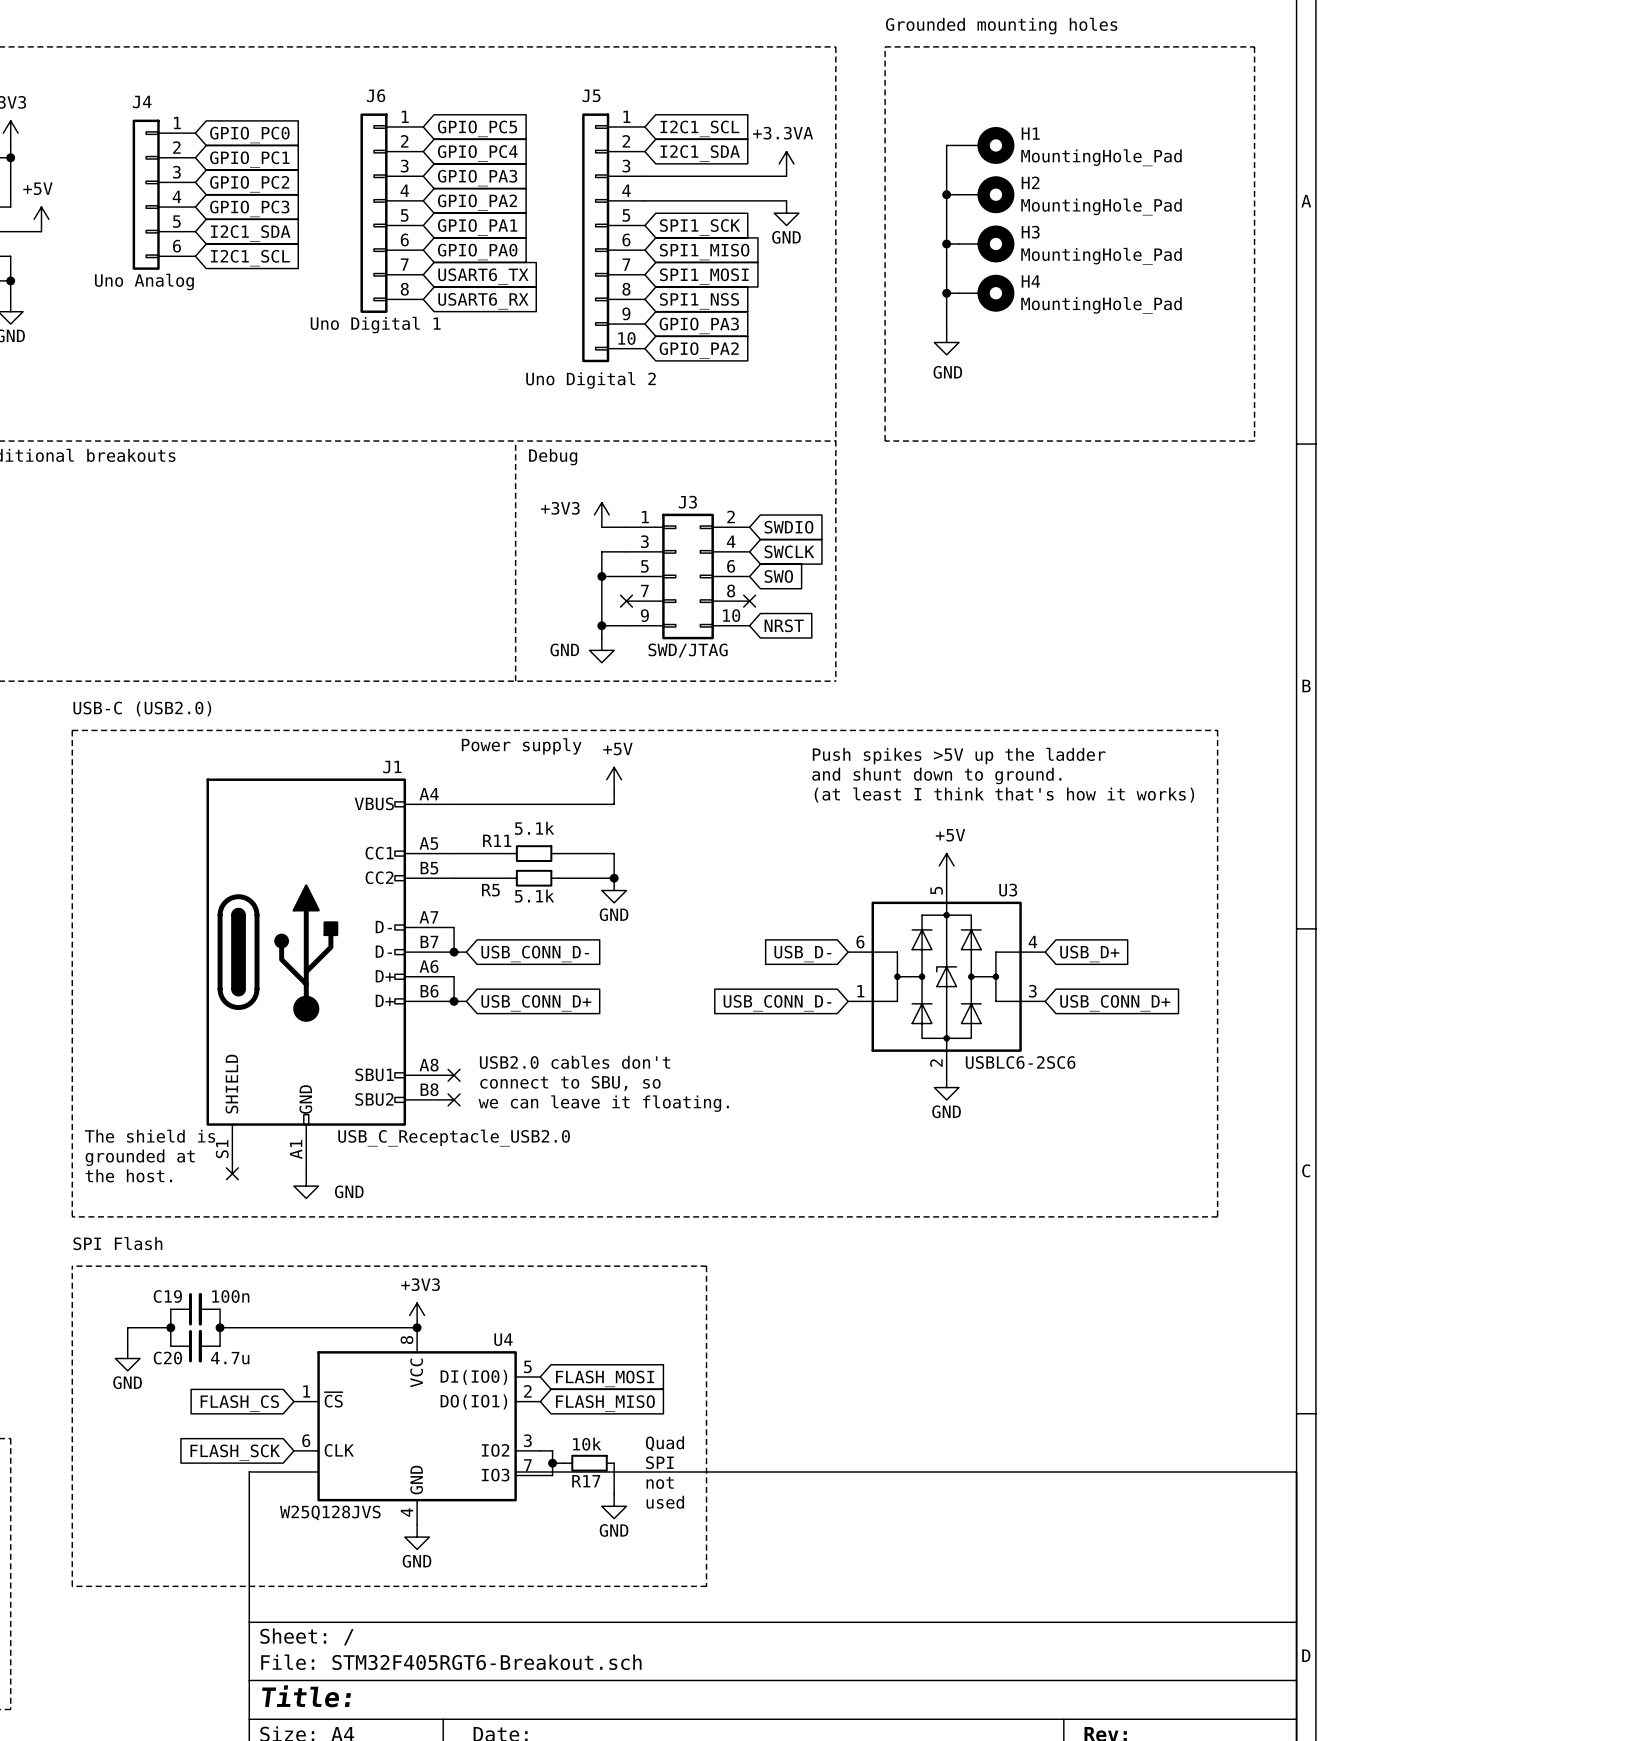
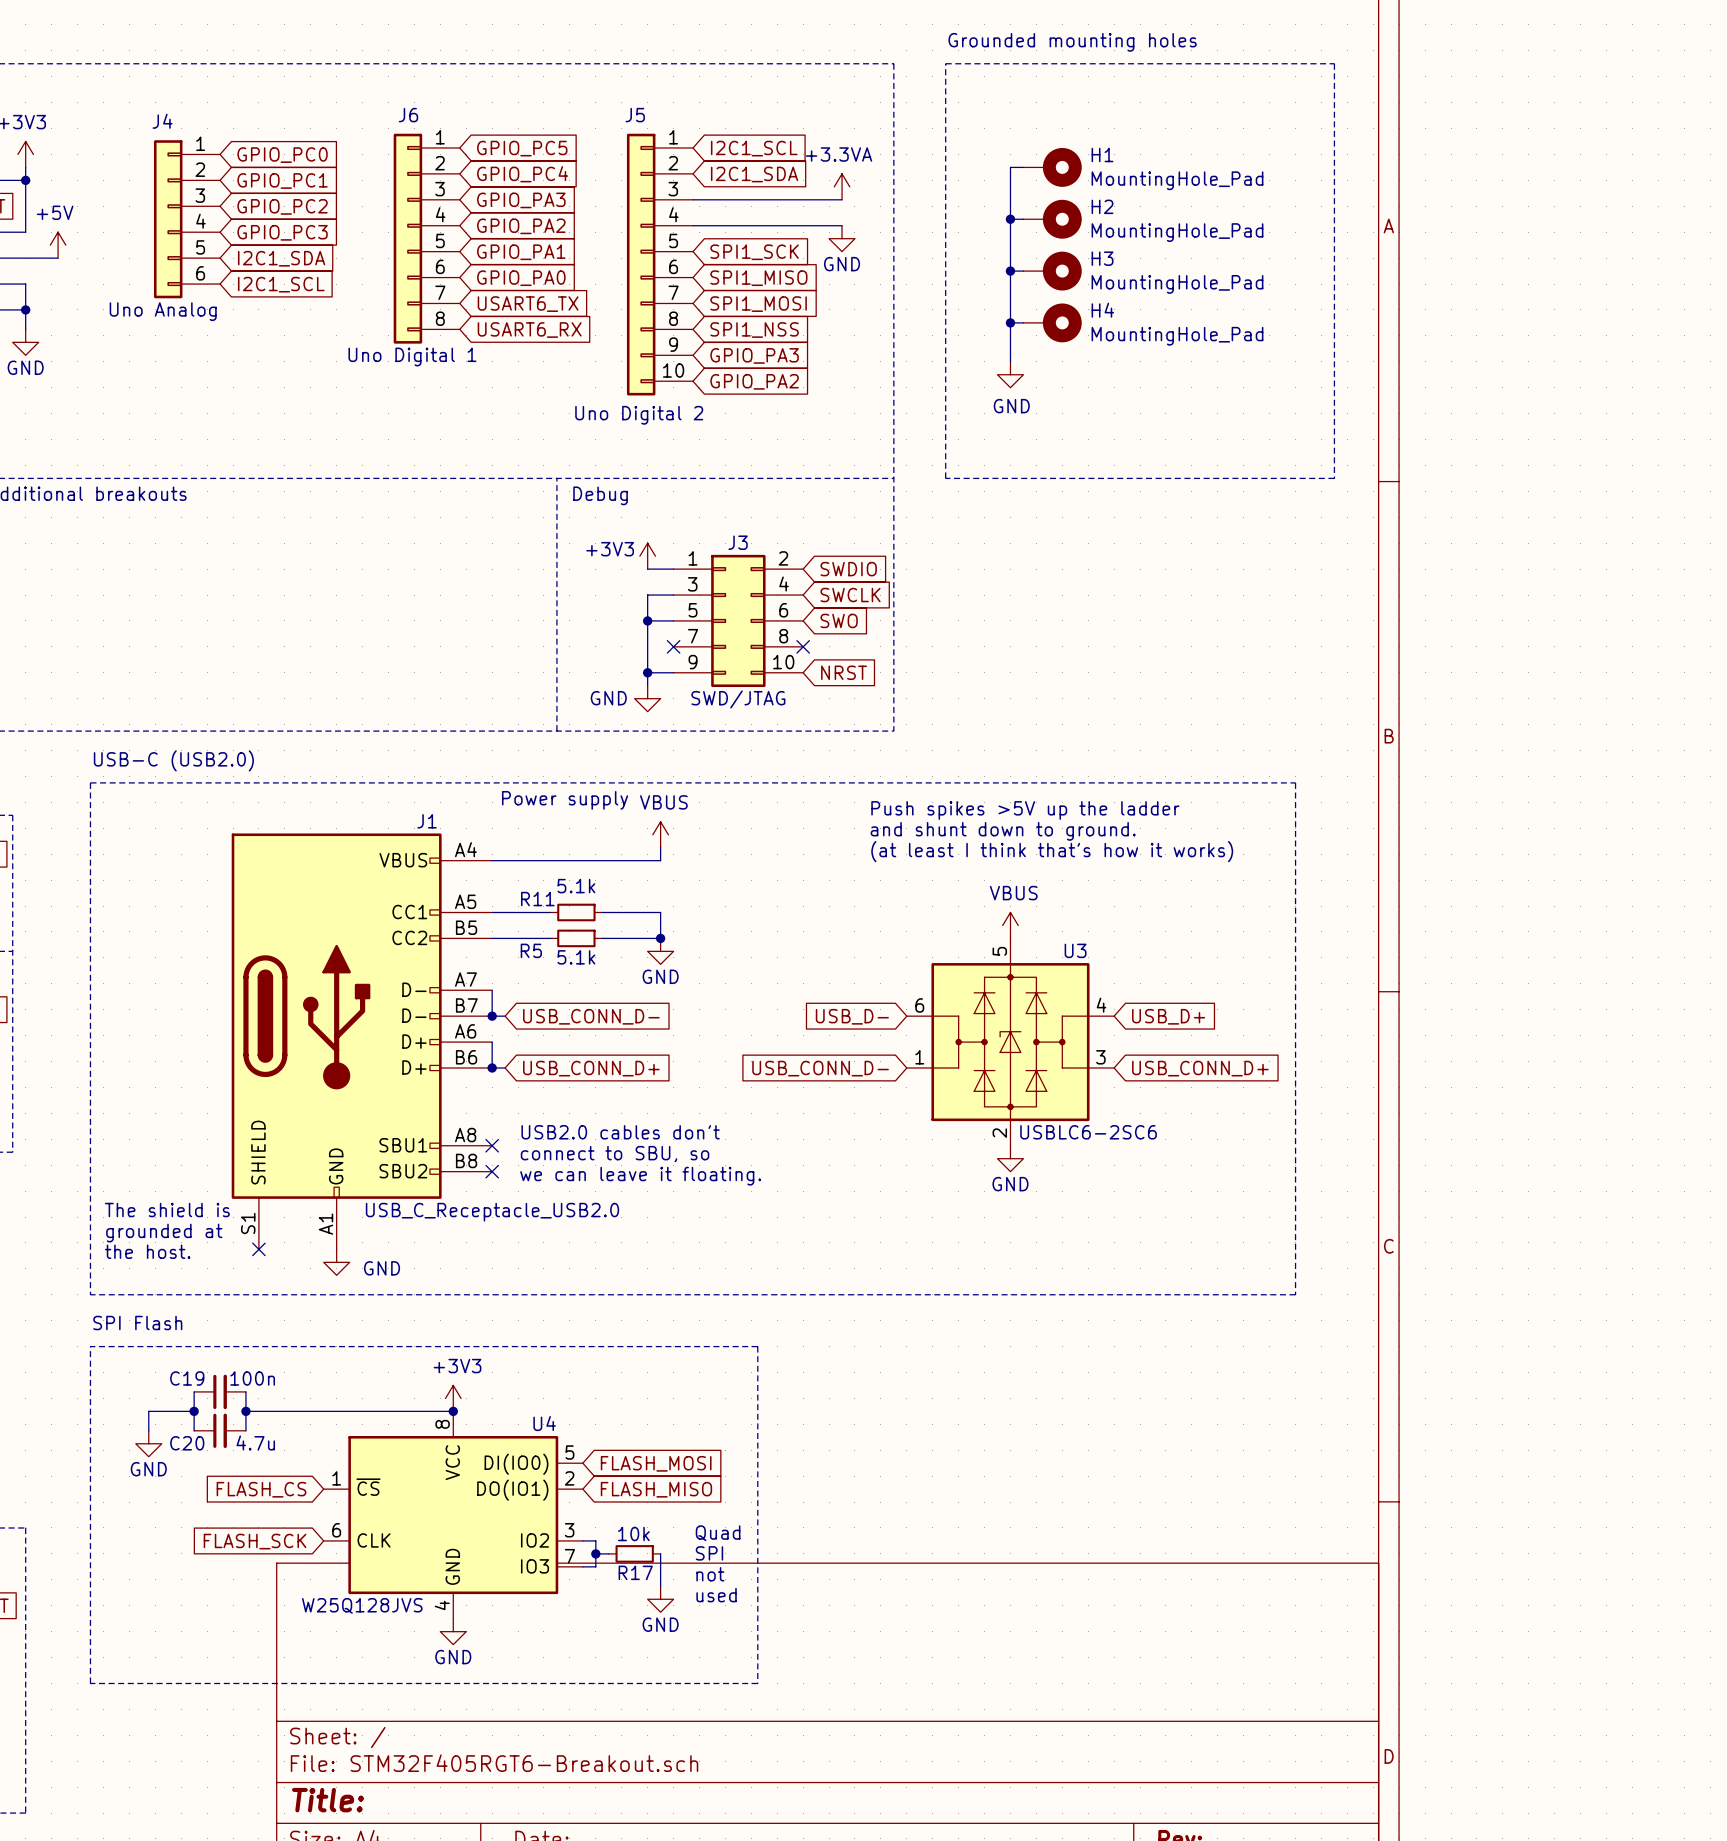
power symbol: +5V (614, 779) -> VBUS (660, 834)
power symbol: +5V (946, 865) -> VBUS (1010, 925)

